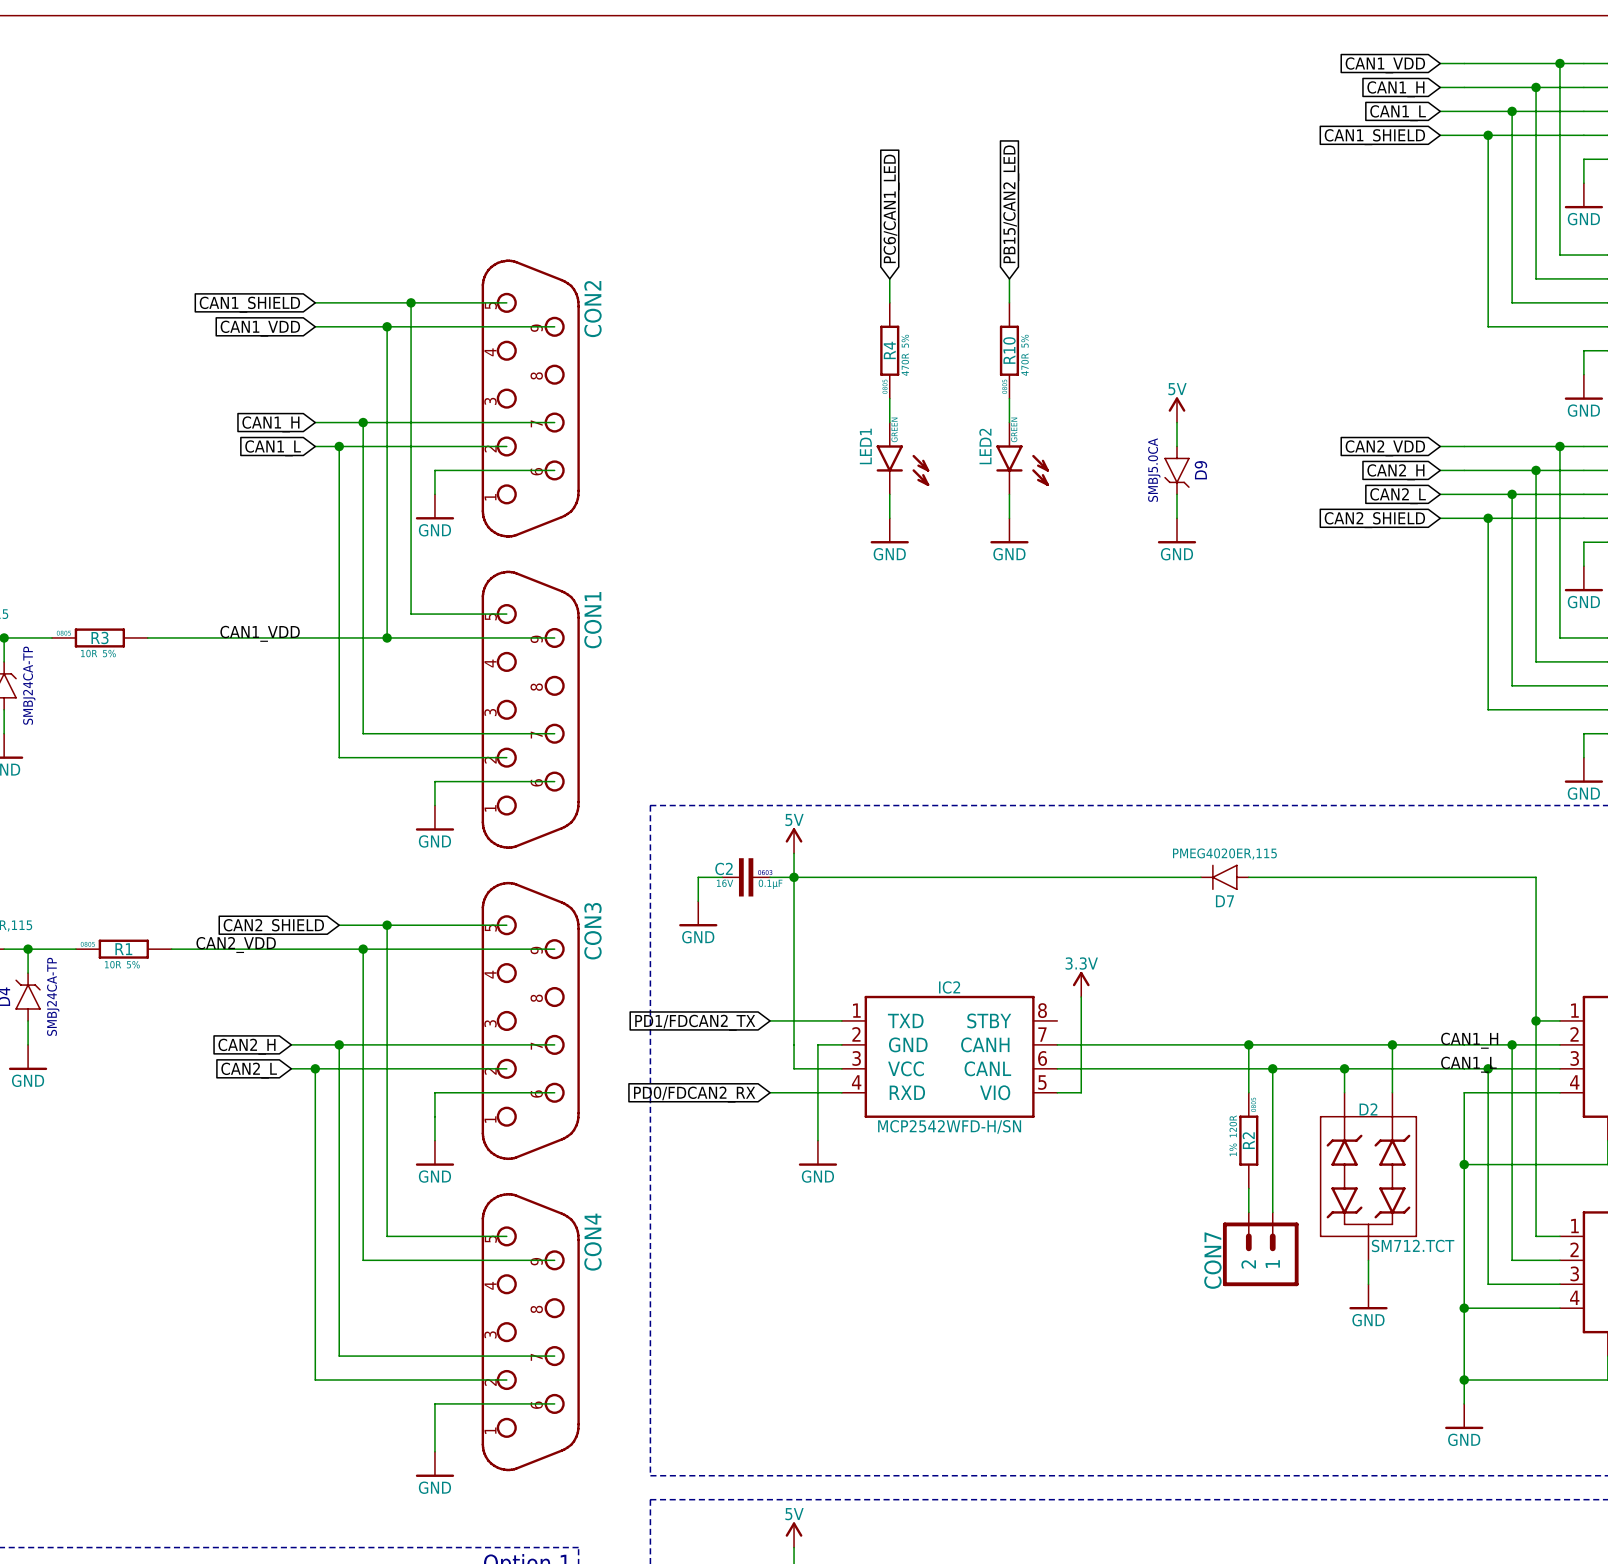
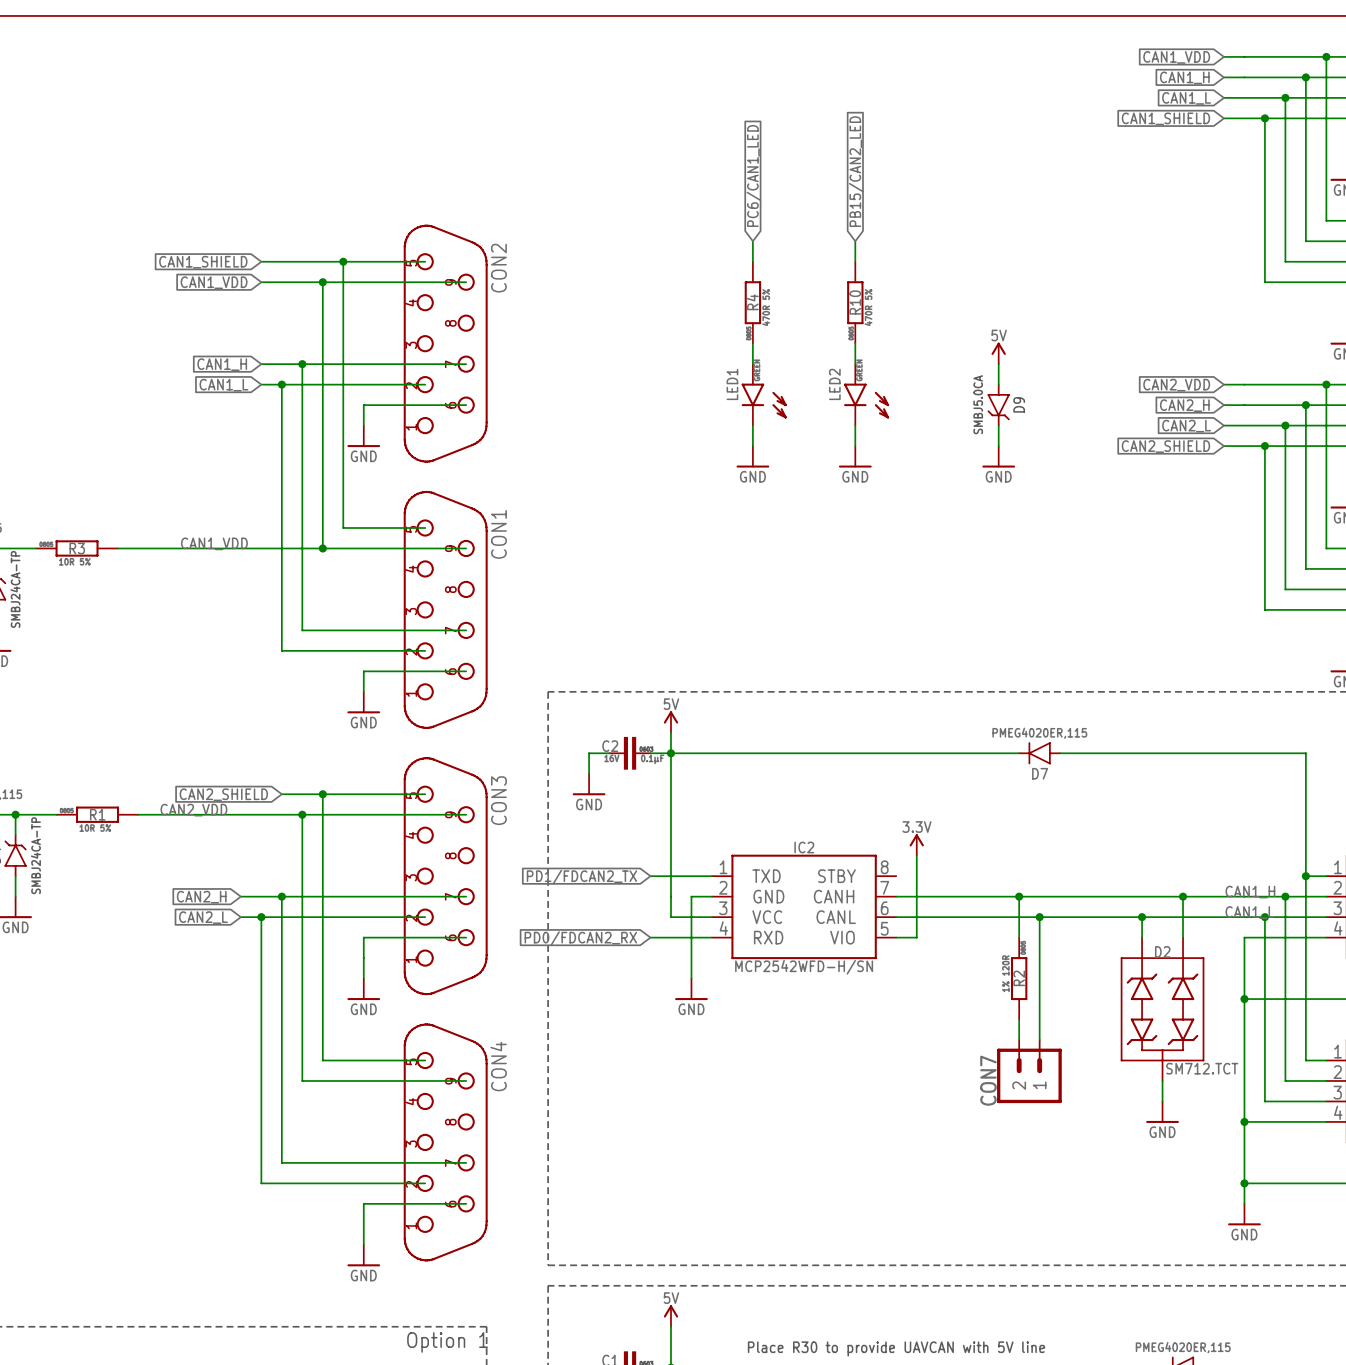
junction: none -> (1019, 896)
wire: (1248, 1044) (1248, 1092) -> (1019, 896) (1019, 937)
junction: (1248, 1044) -> none
junction: none -> (1039, 917)
wire: (1272, 1068) (1272, 1212) -> (1039, 917) (1039, 1040)
junction: (1272, 1068) -> none
R2 position: (1248, 1140) -> (1019, 978)
wire: (1248, 1188) (1248, 1212) -> (1019, 1019) (1019, 1040)
CON7 position: (1260, 1249) -> (1029, 1071)

